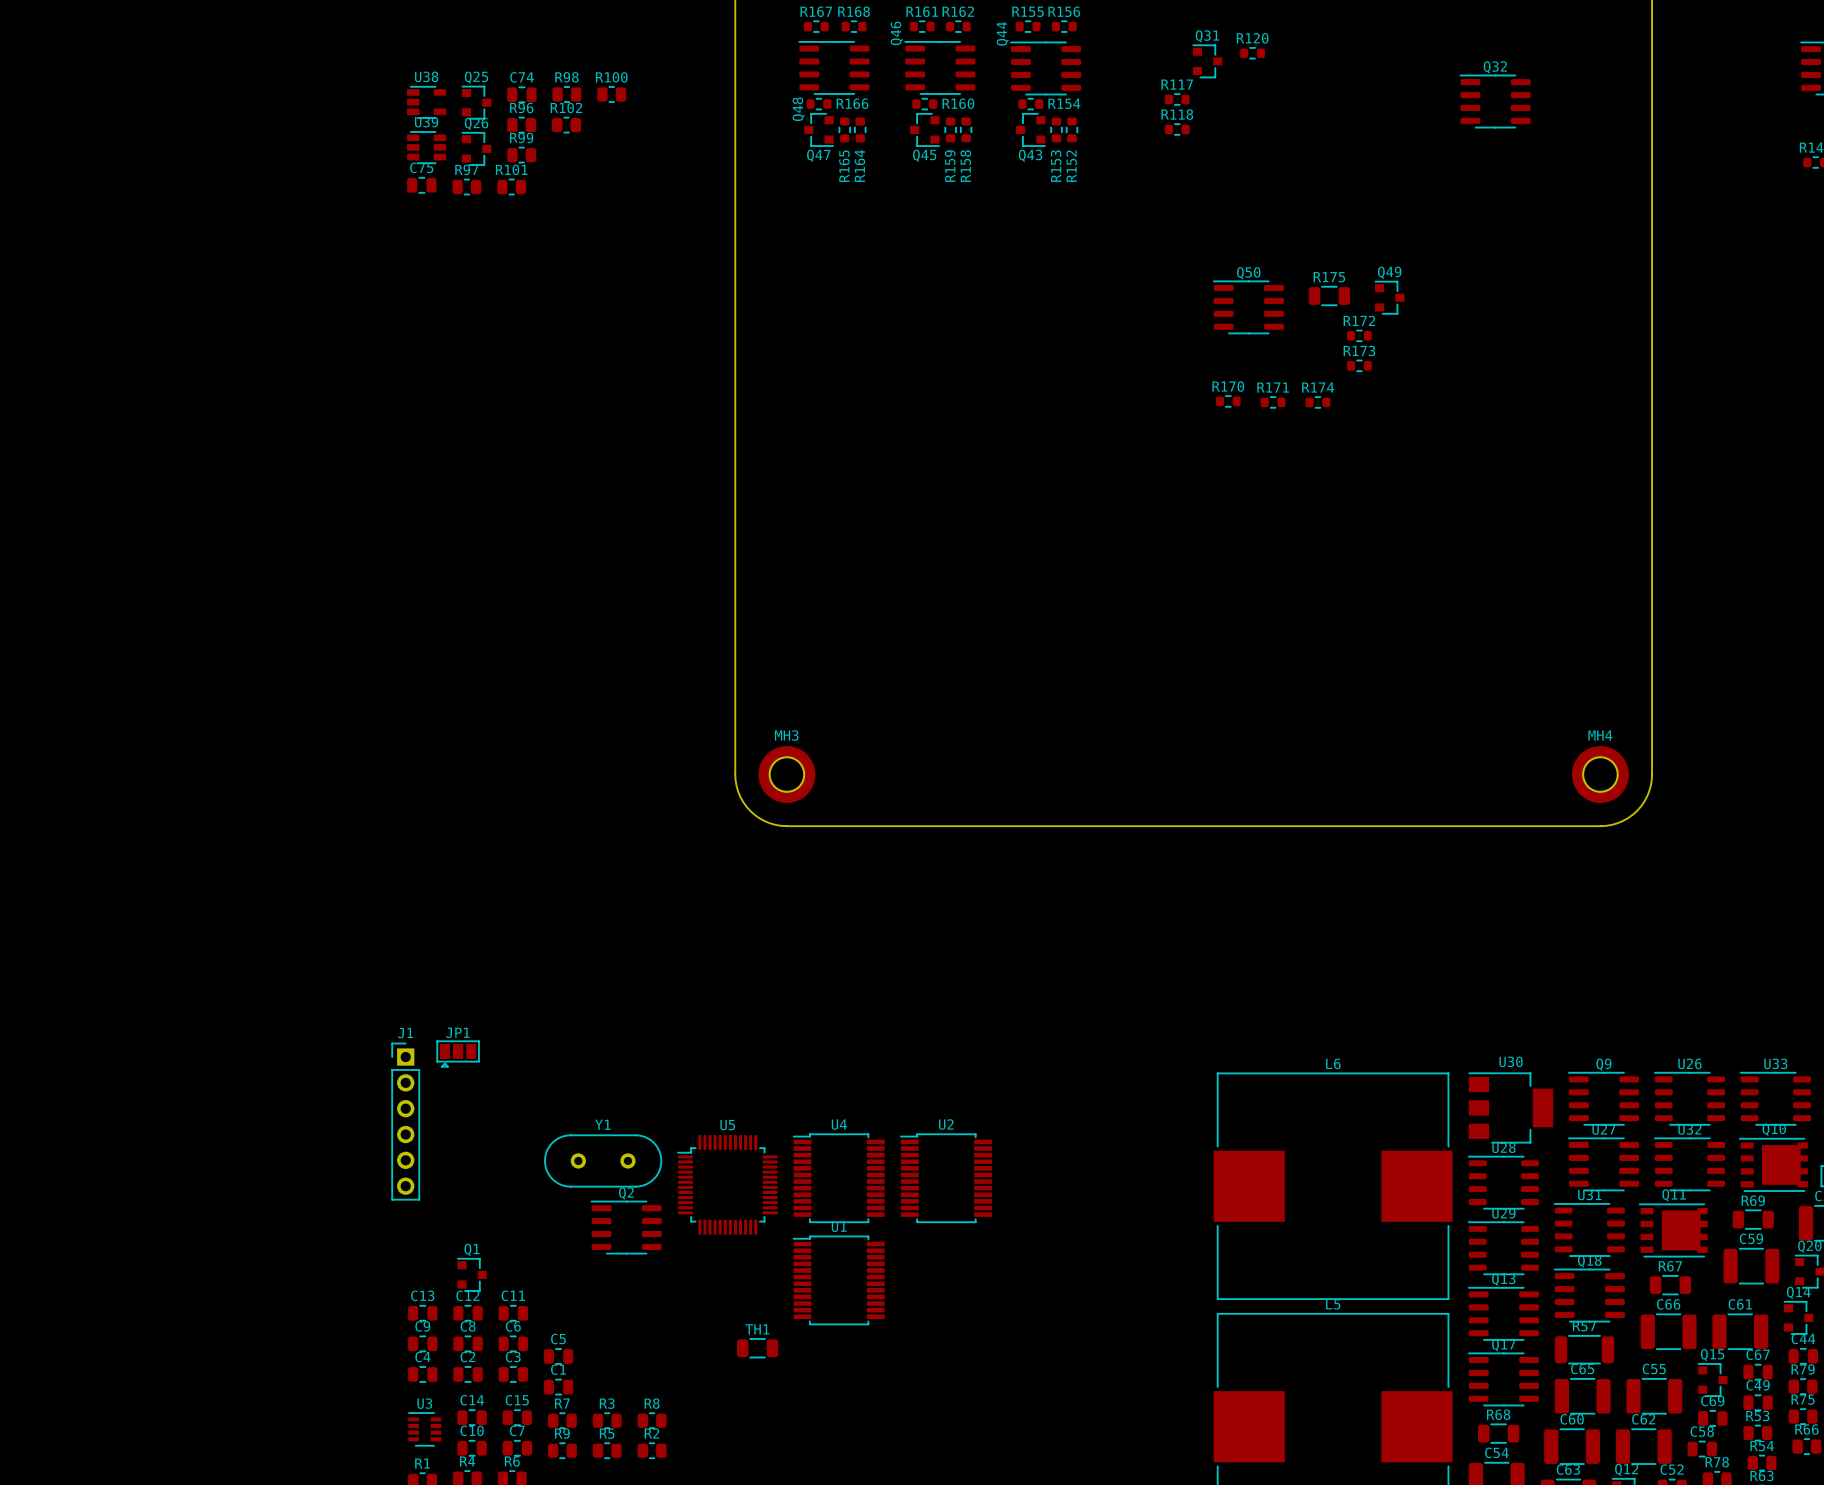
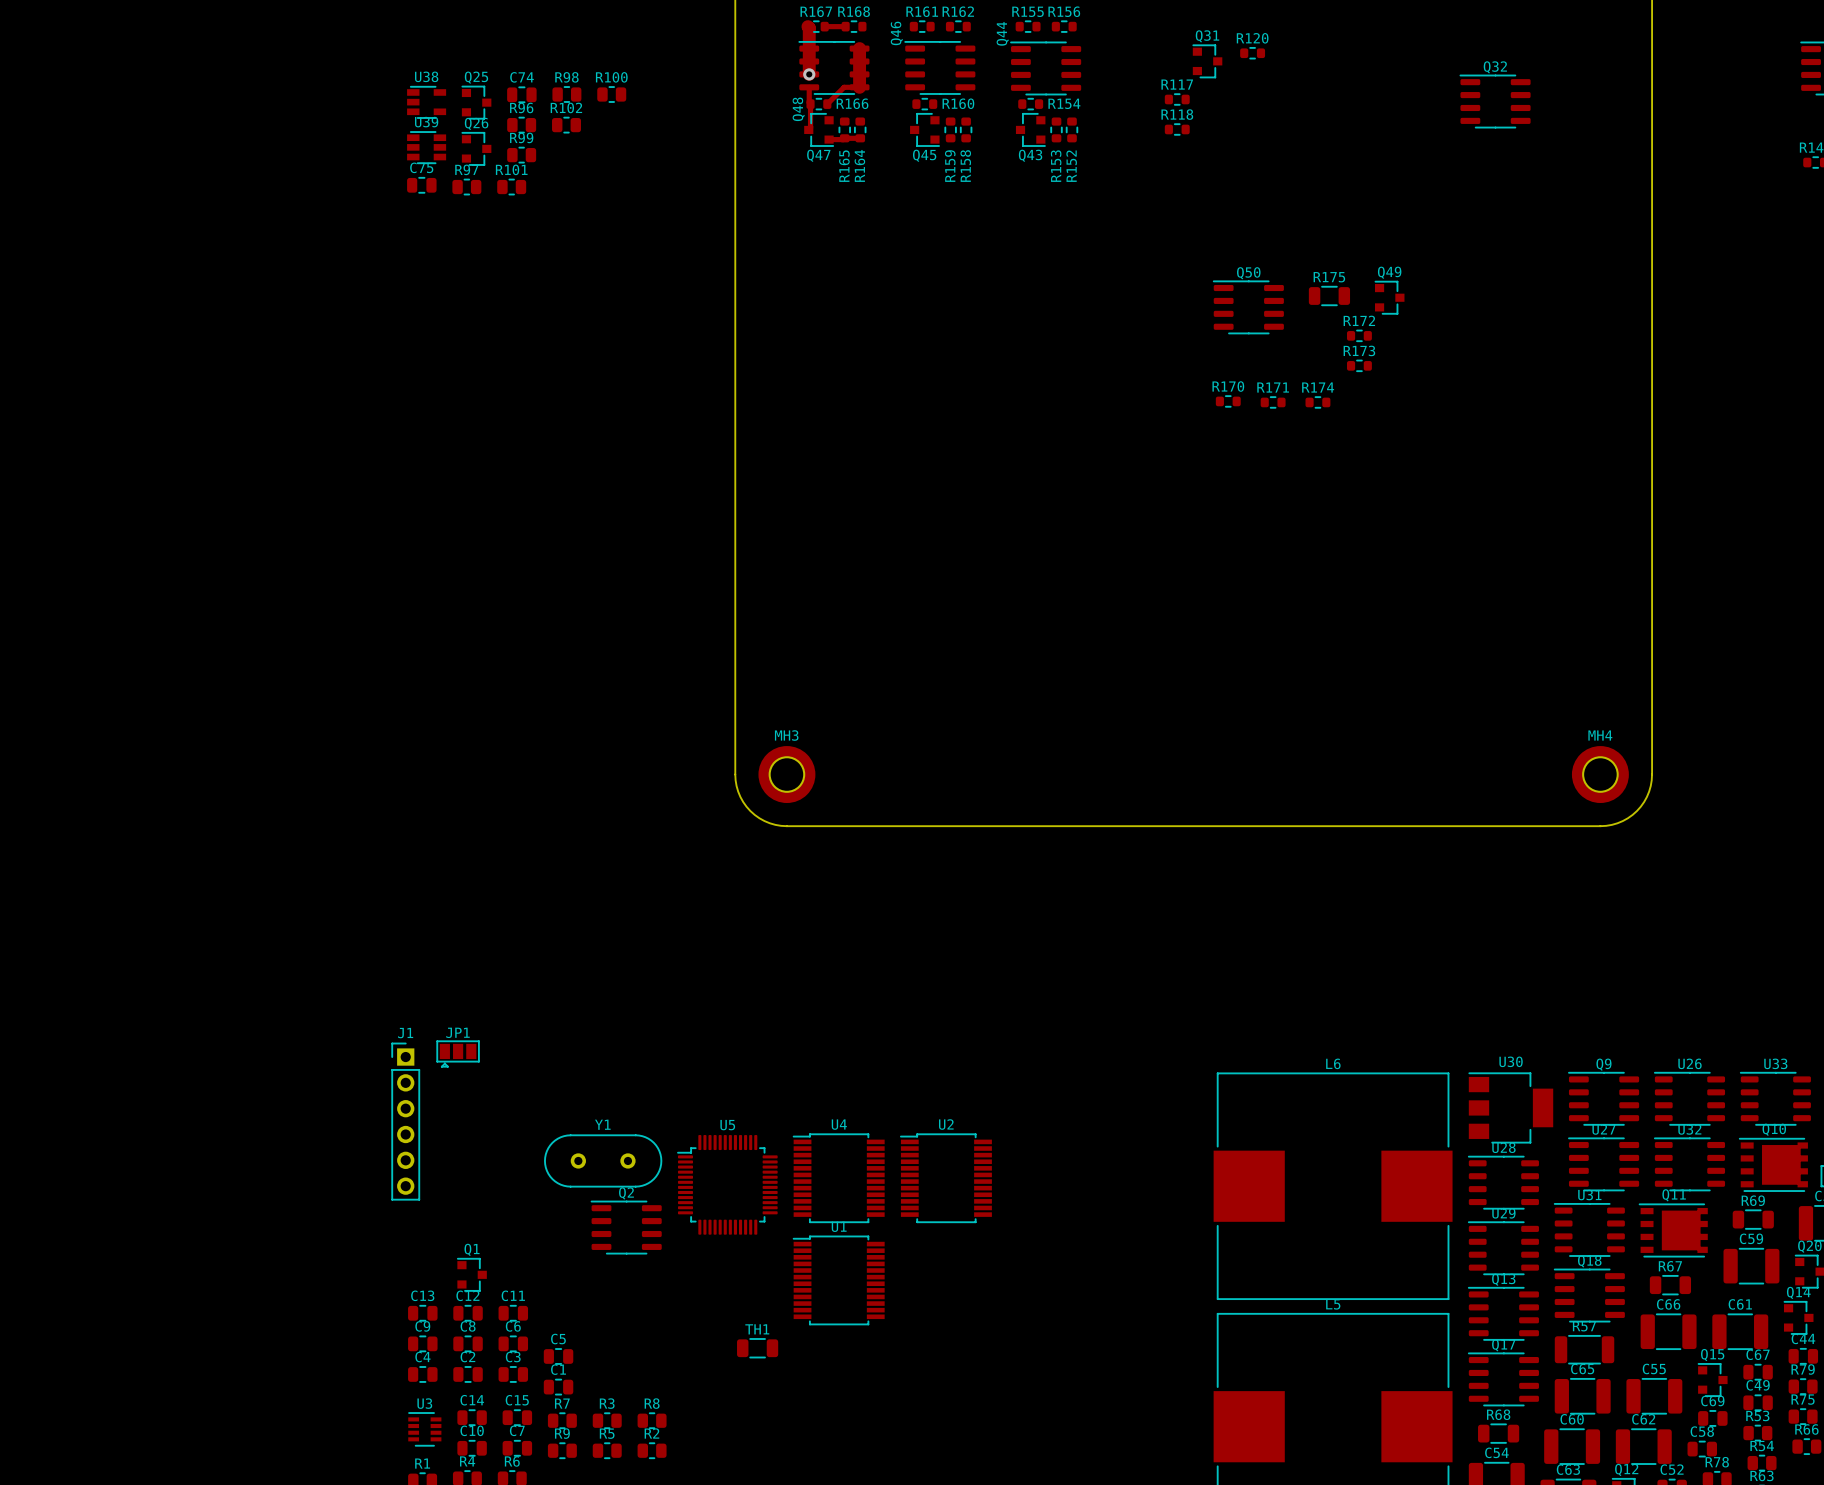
track: none -> (807, 26) (809, 74)
track: none -> (824, 26) (845, 26)
track: none -> (859, 48) (859, 87) (844, 87) (827, 104)
via: none -> (809, 74)
track: none -> (809, 87) (810, 128) (808, 129)
track: none -> (860, 138) (829, 139)

